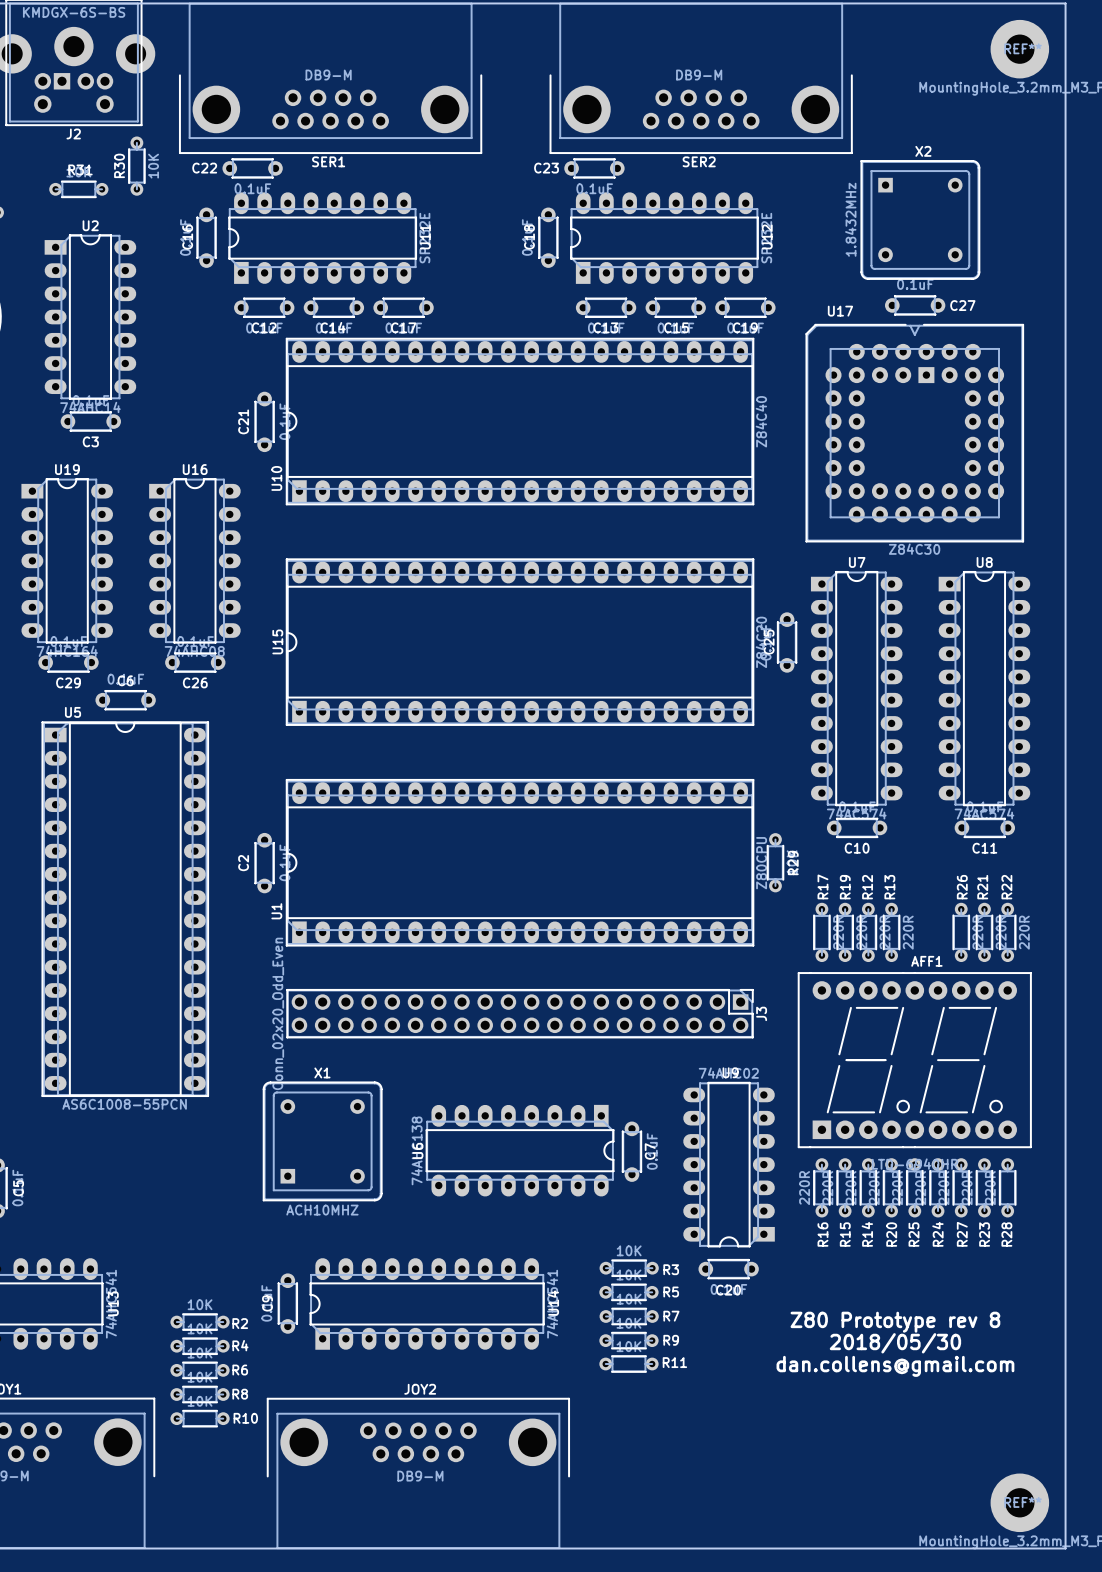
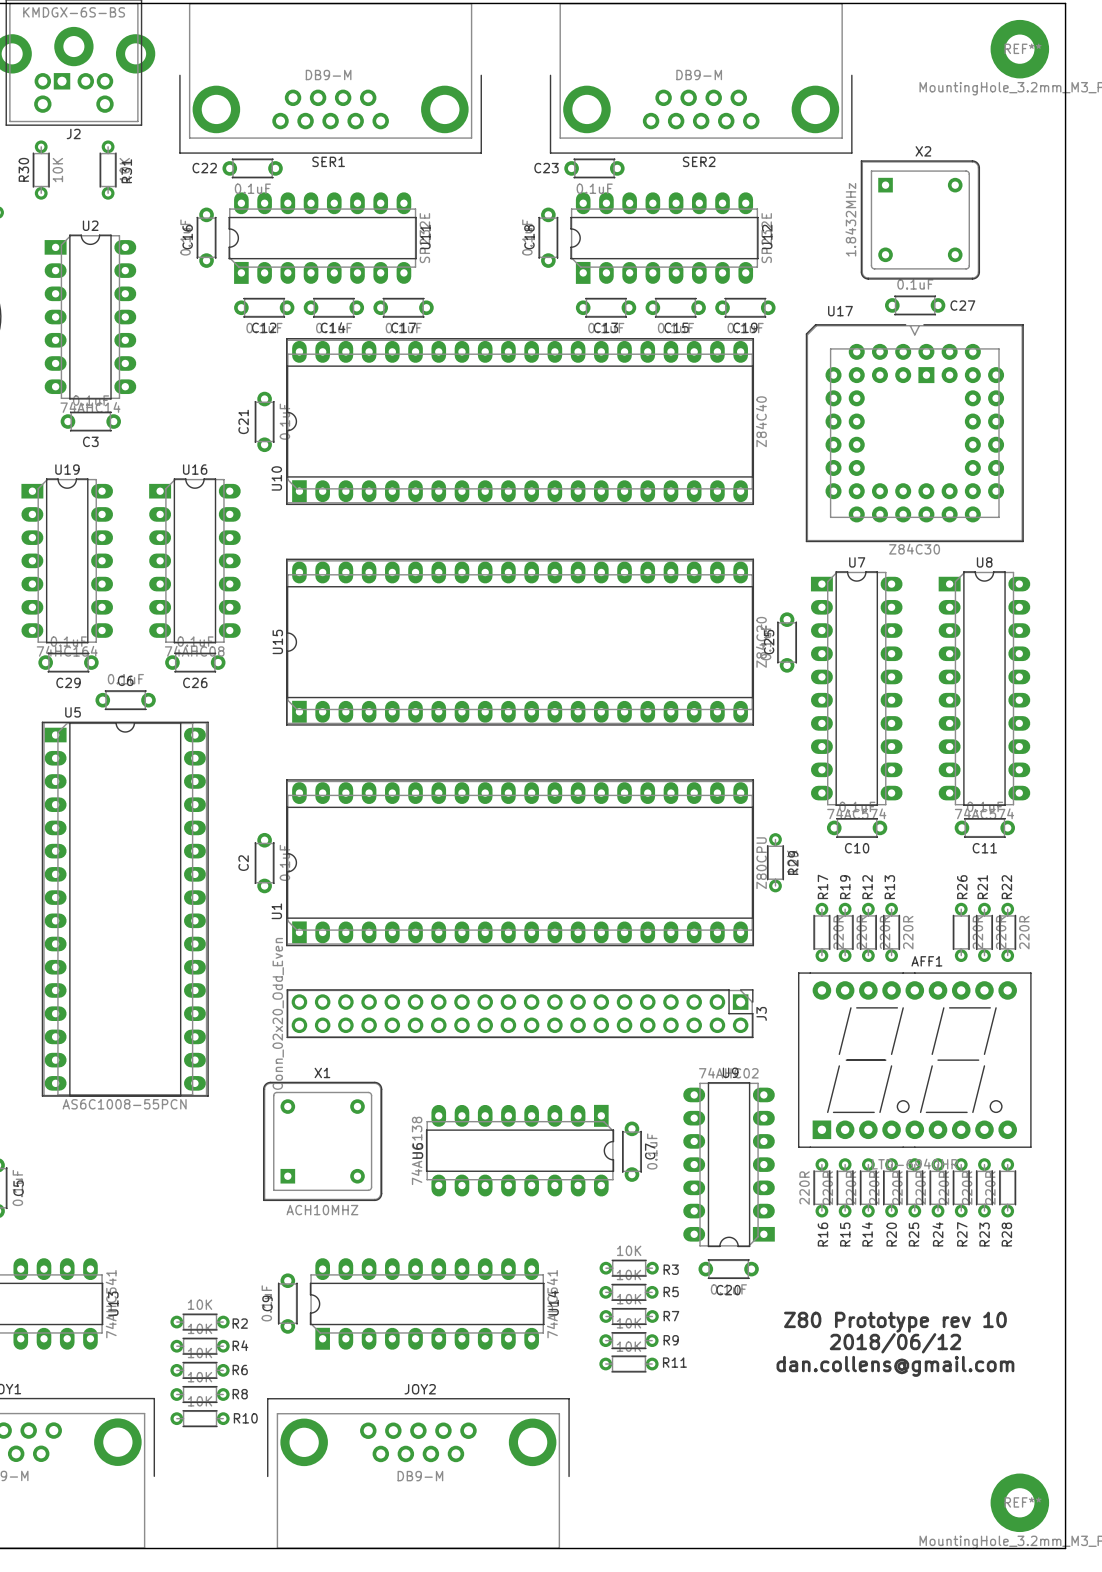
R30 position: (136, 166) -> (41, 170)
R31 rotation: 0° (78, 189) -> 90° clockwise (108, 170)
text: Z80 Prototype rev 8 (895, 1322) -> Z80 Prototype rev 10 (895, 1322)
text: 2018/05/30 (895, 1343) -> 2018/06/12 (895, 1343)

